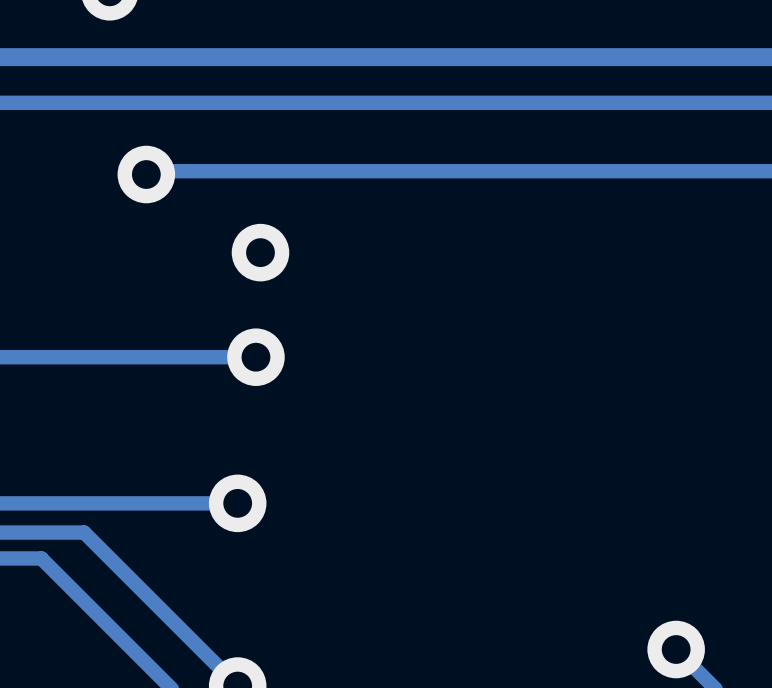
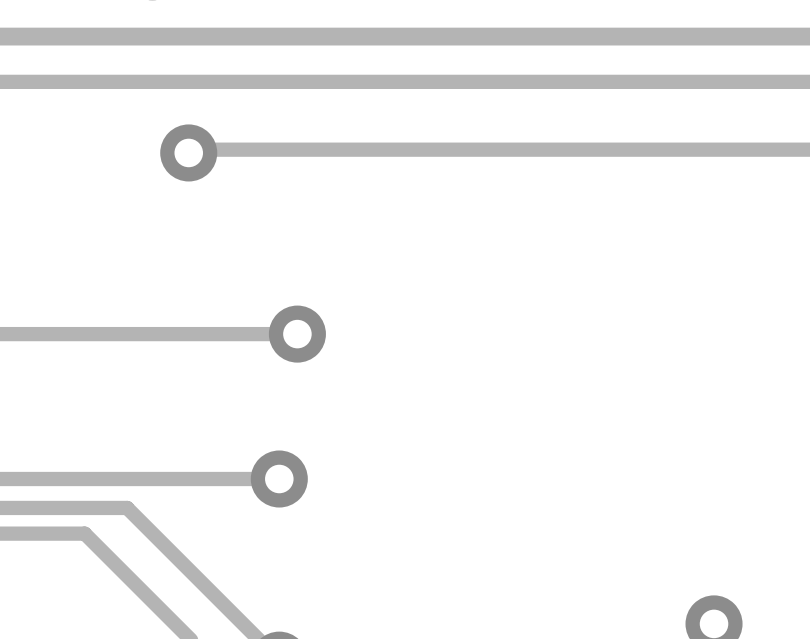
via: (260, 252) -> none

